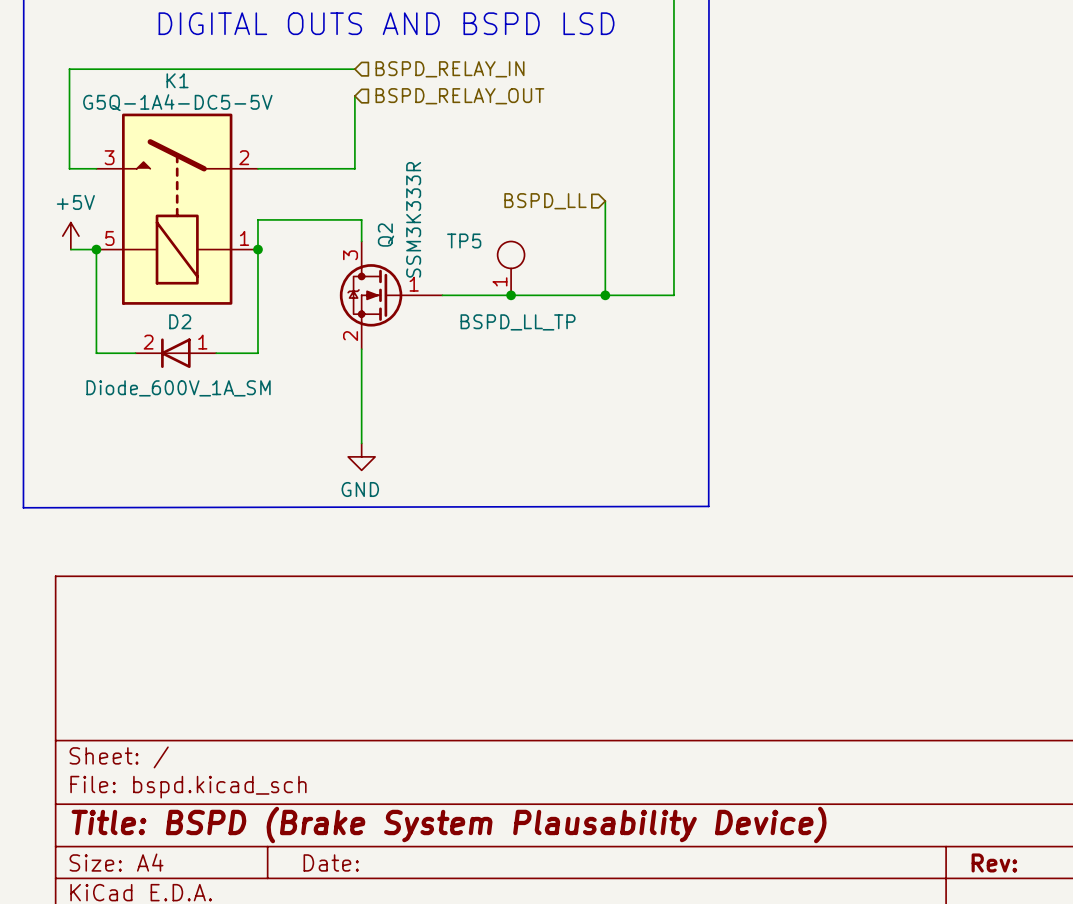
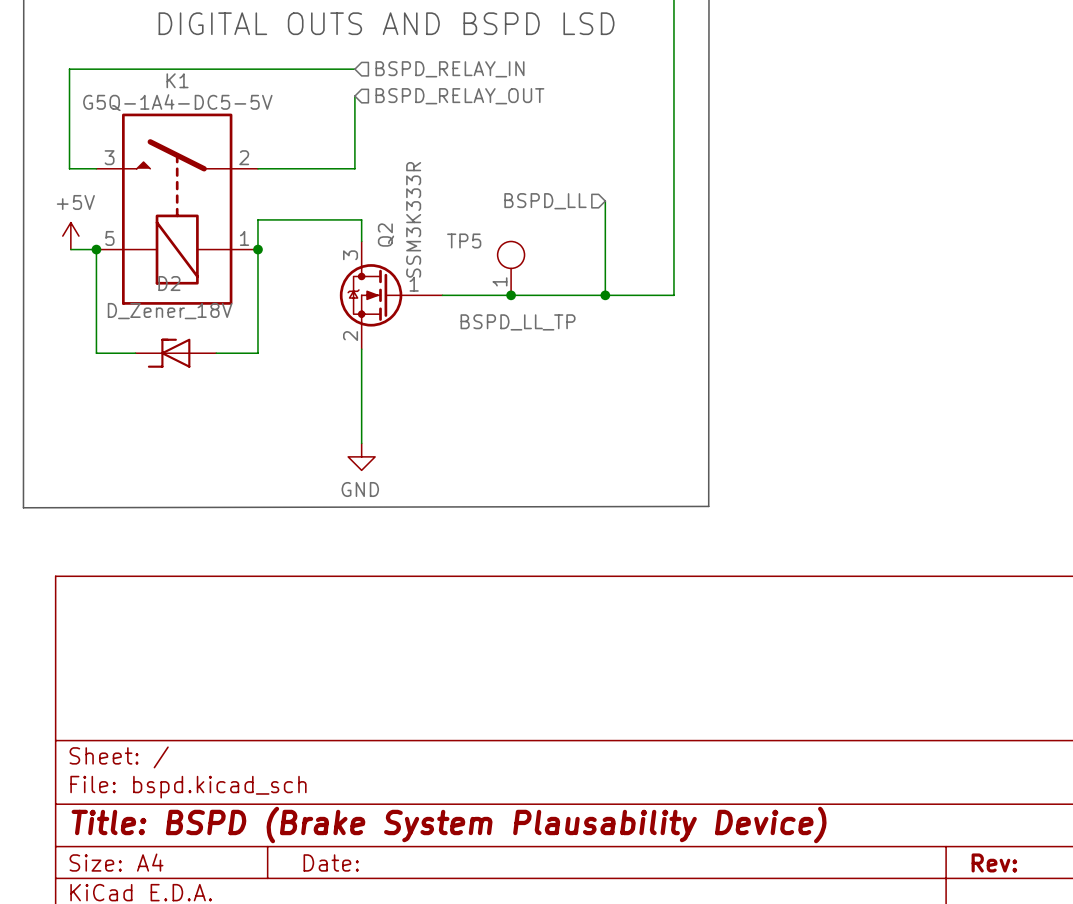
D2 name position: D2 (180, 321) -> D2 (169, 283)
D2 symbol: [135, 338, 217, 369] -> [135, 338, 217, 368]
D2 value: Diode_600V_1A_SM (178, 388) -> D_Zener_18V (170, 311)

